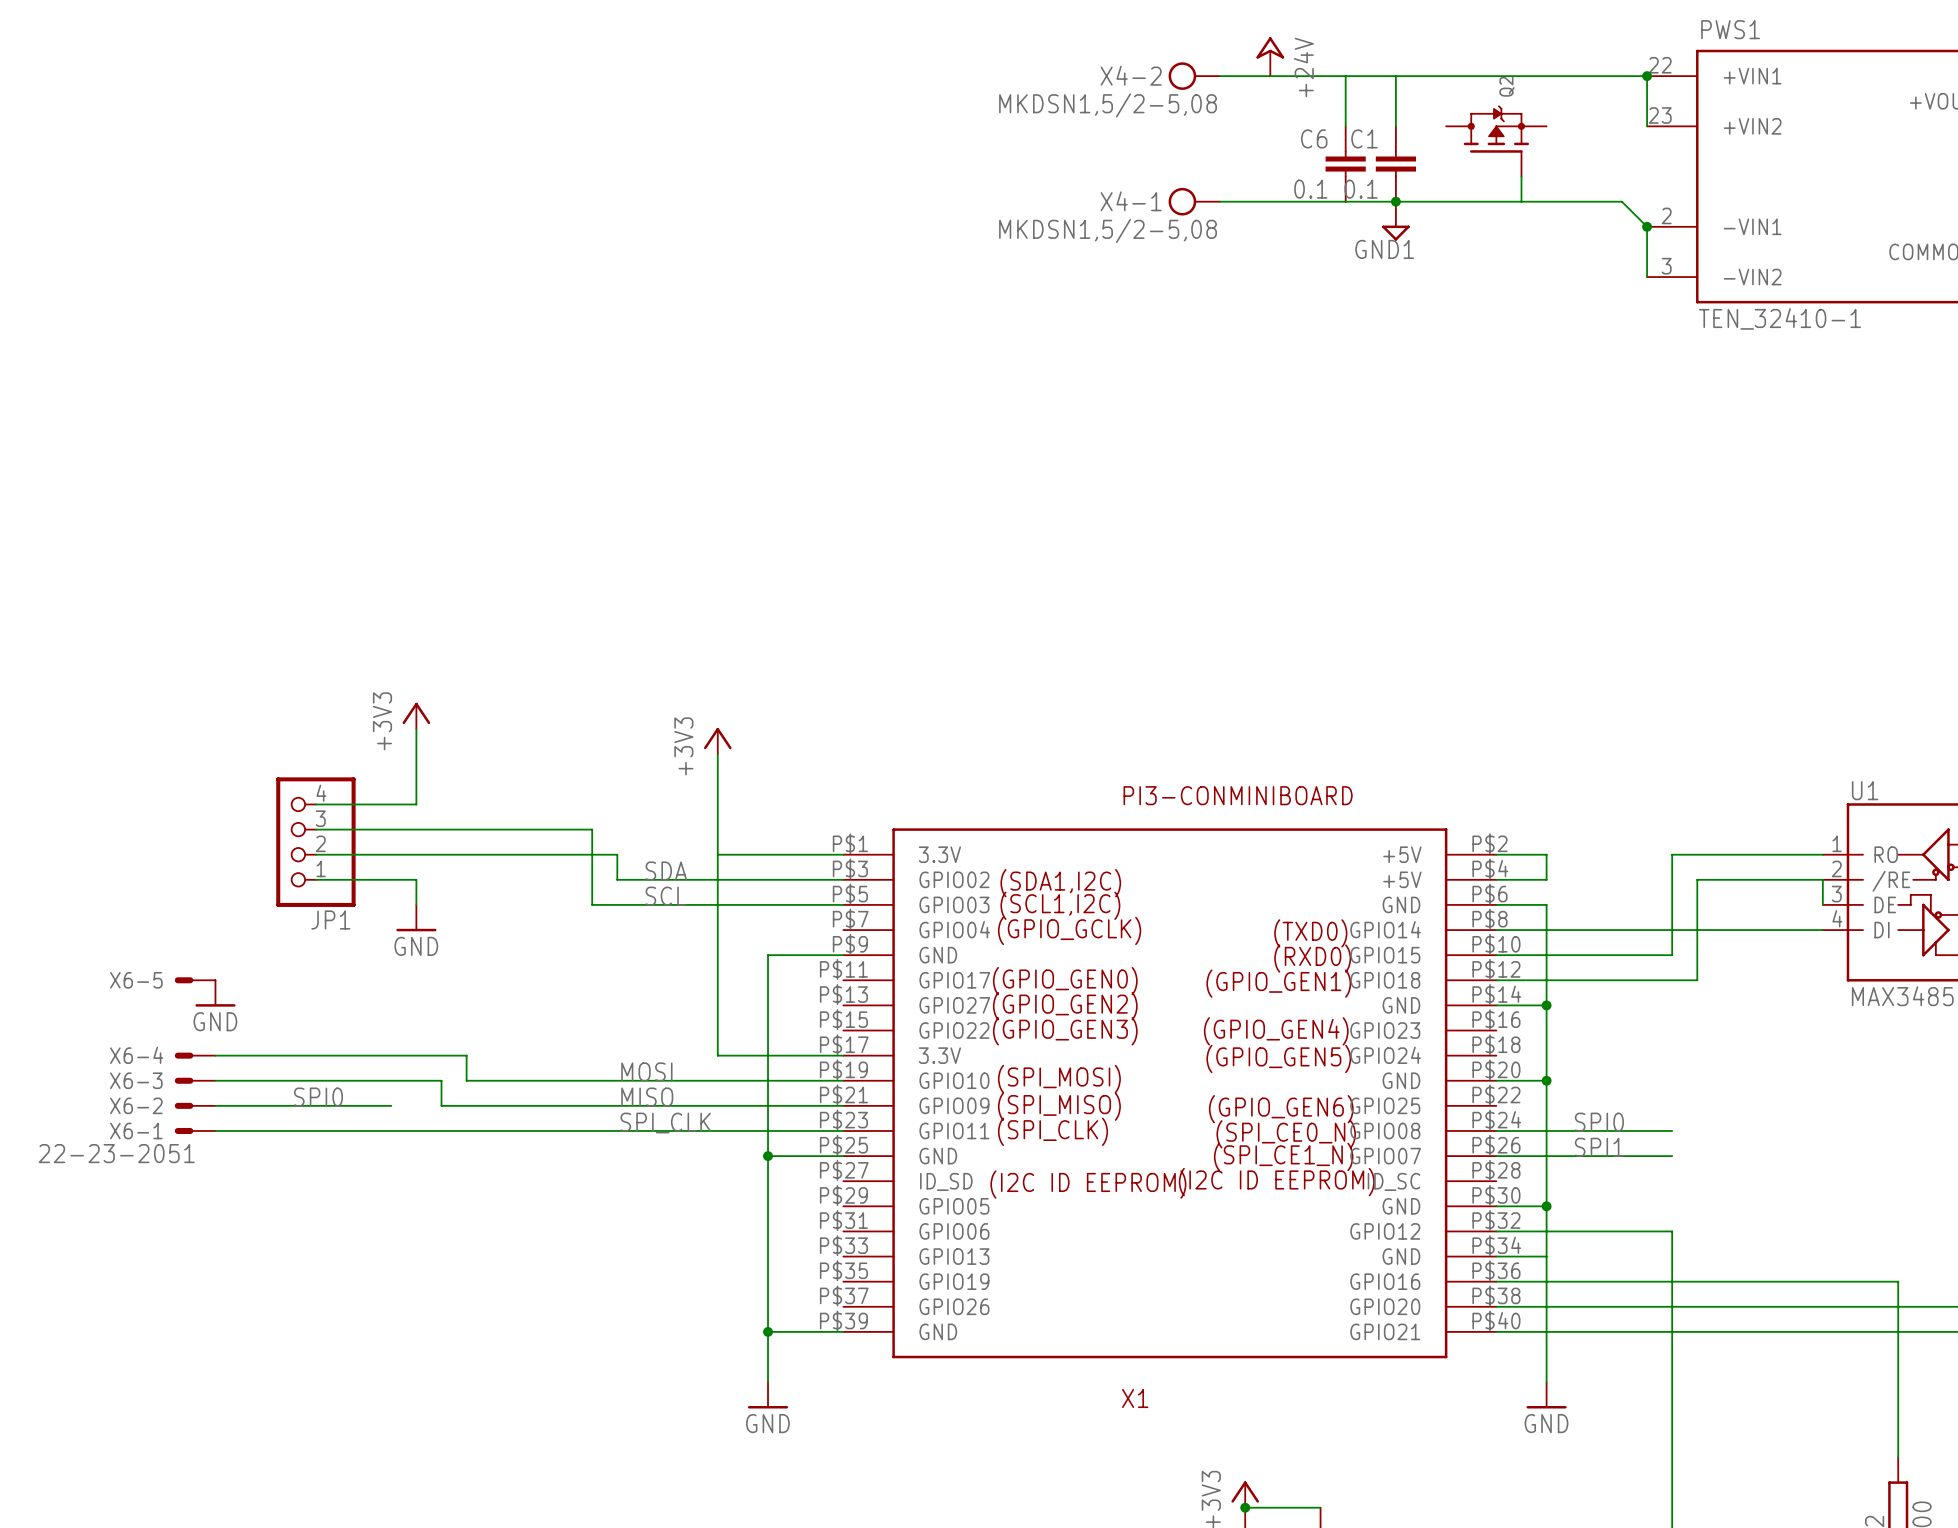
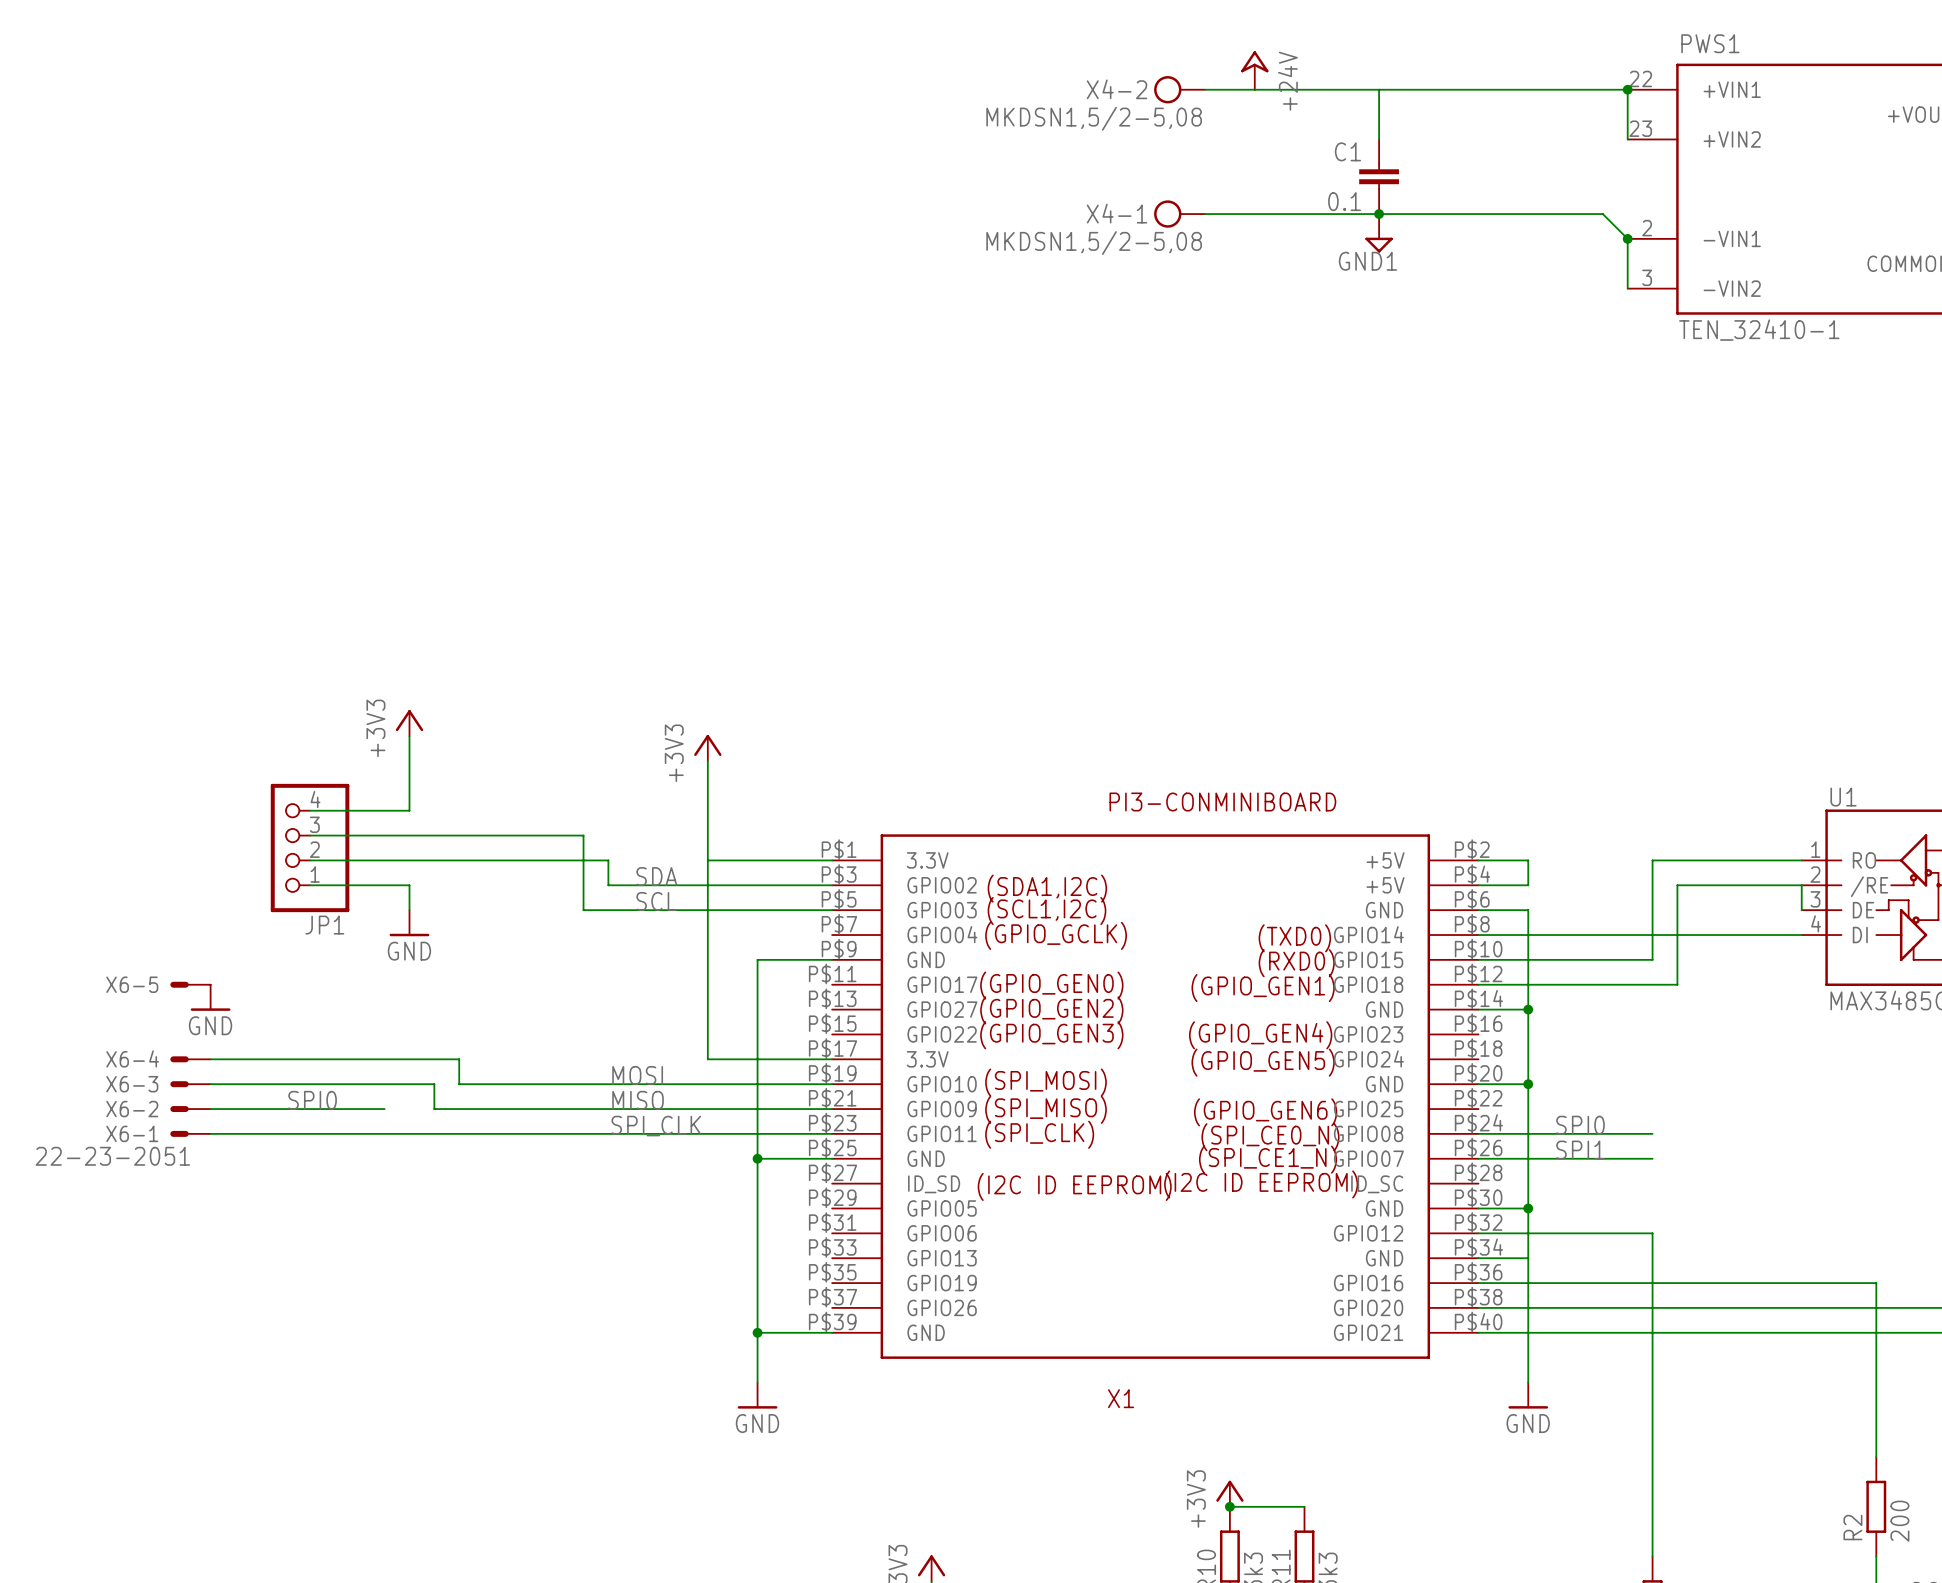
wire: (1345, 76) (1345, 126) -> none
Q2: (1496, 141) -> none
C6: 0.1 (1345, 164) -> none
wire: (1521, 176) (1521, 201) -> none

